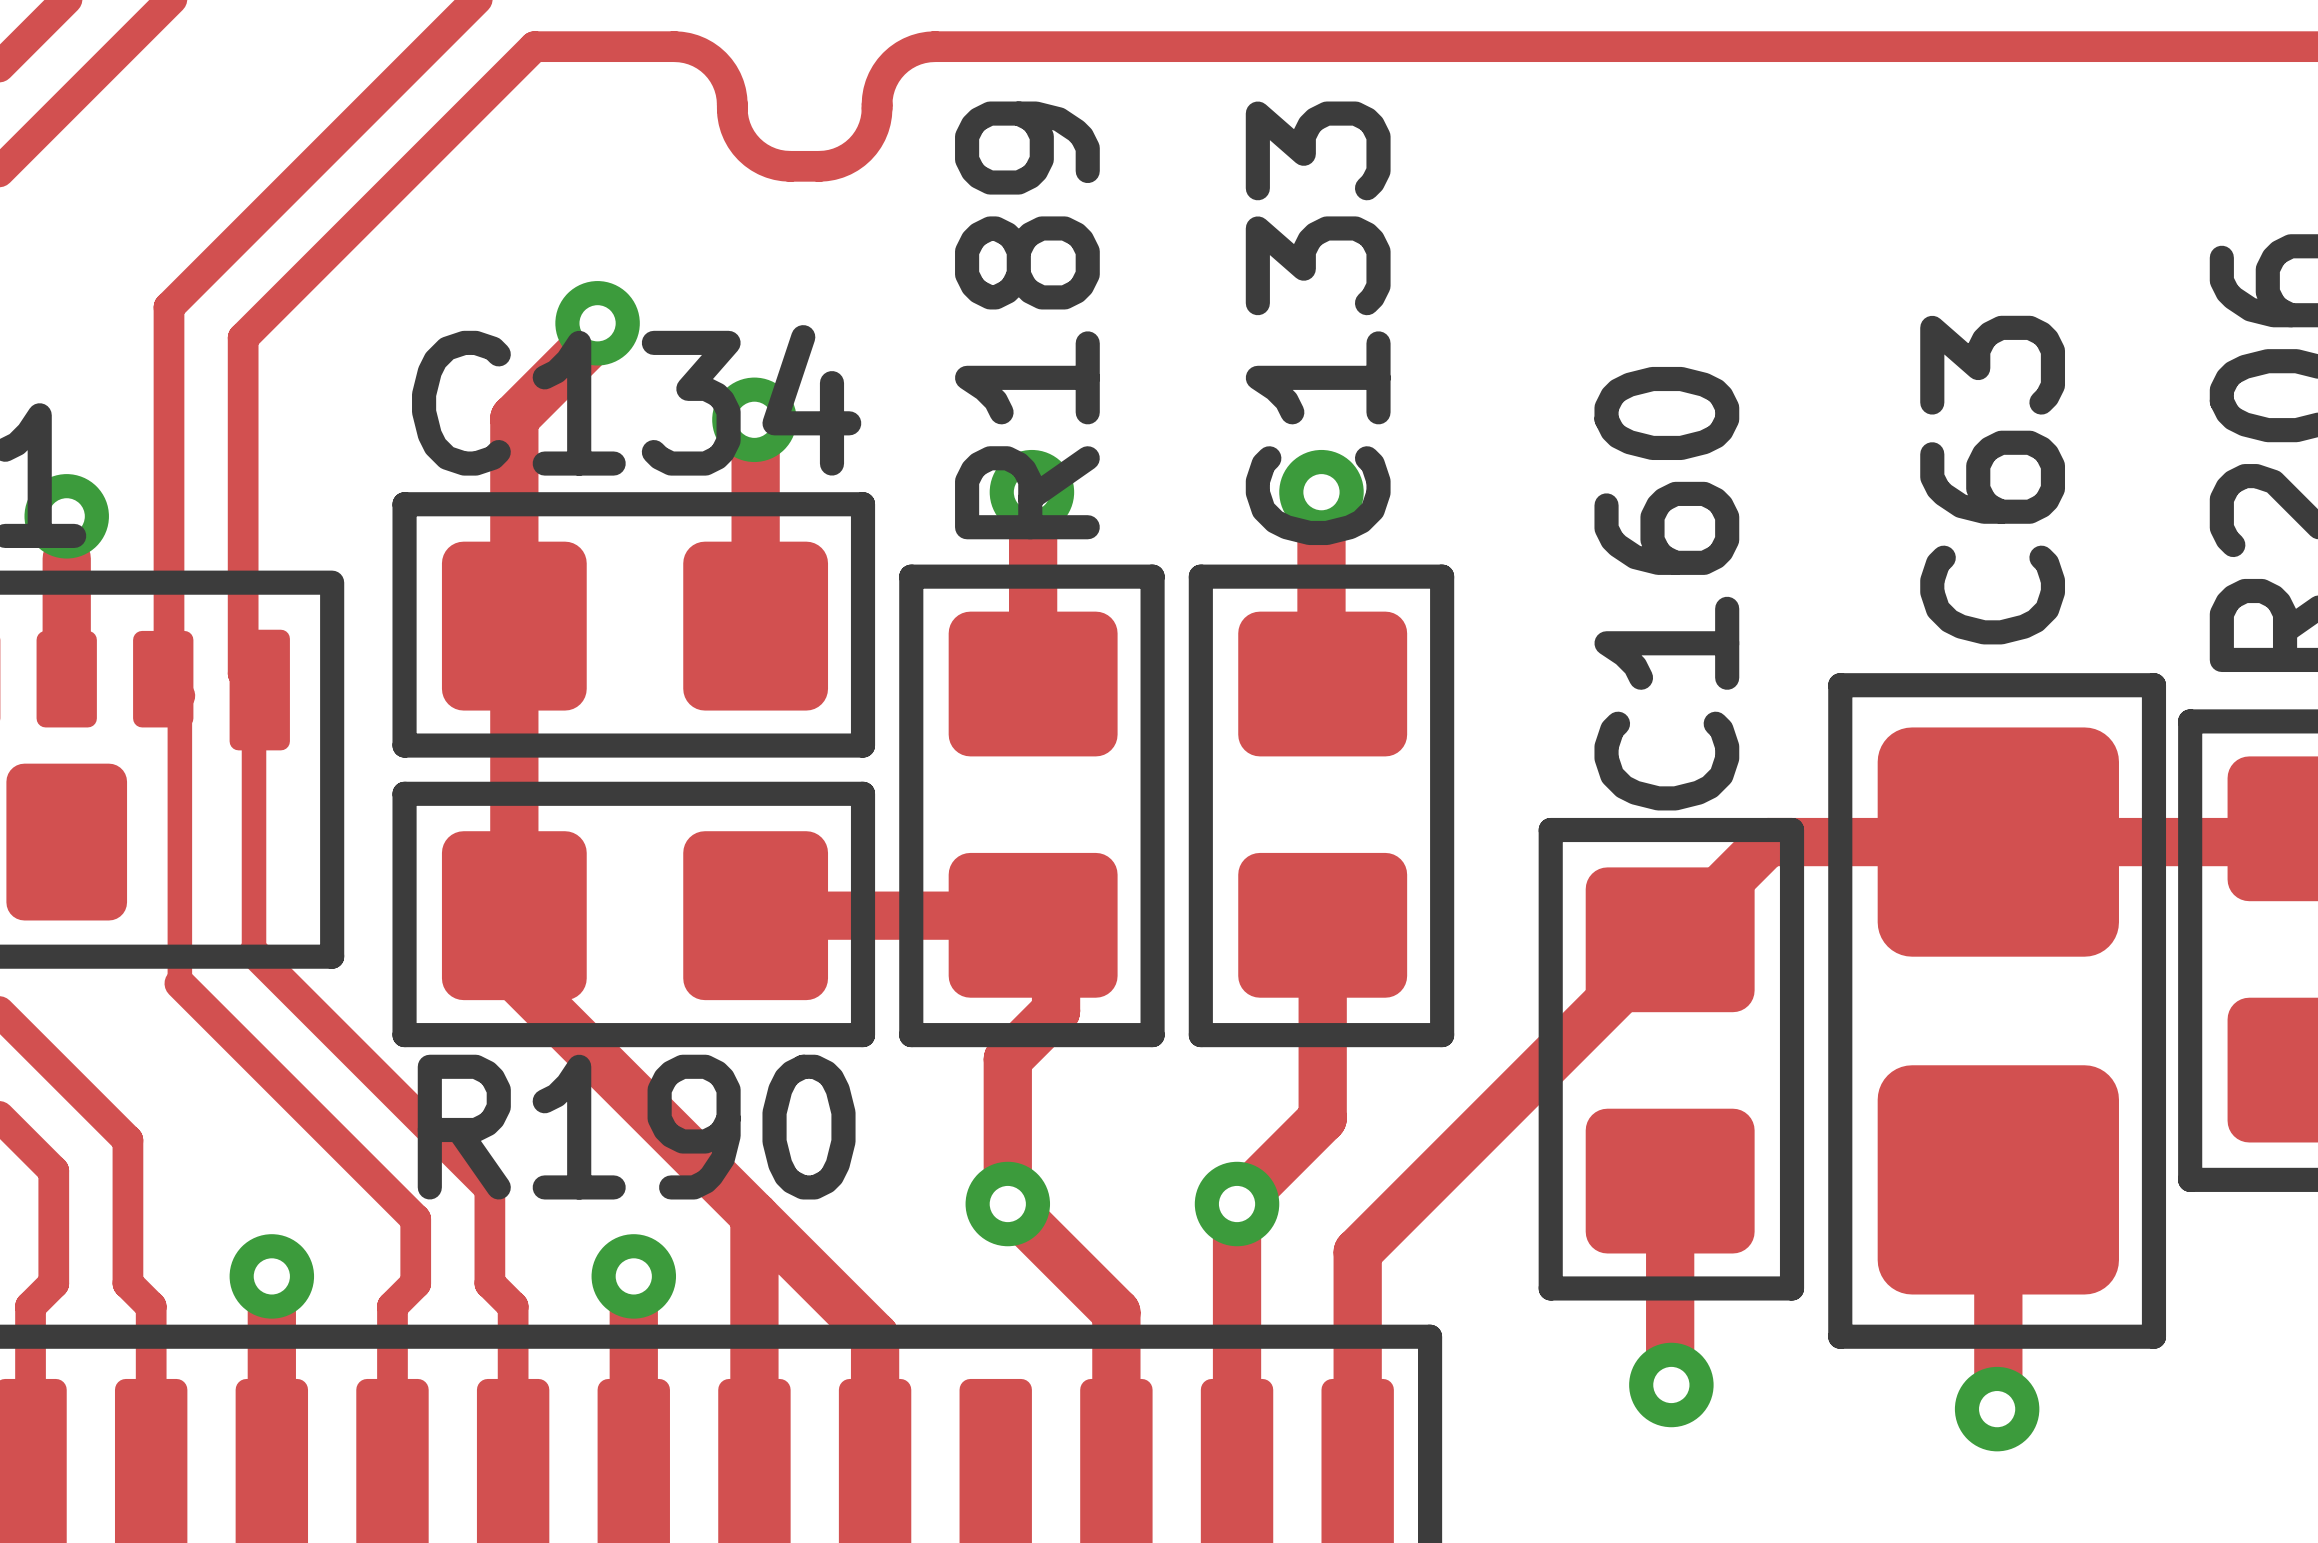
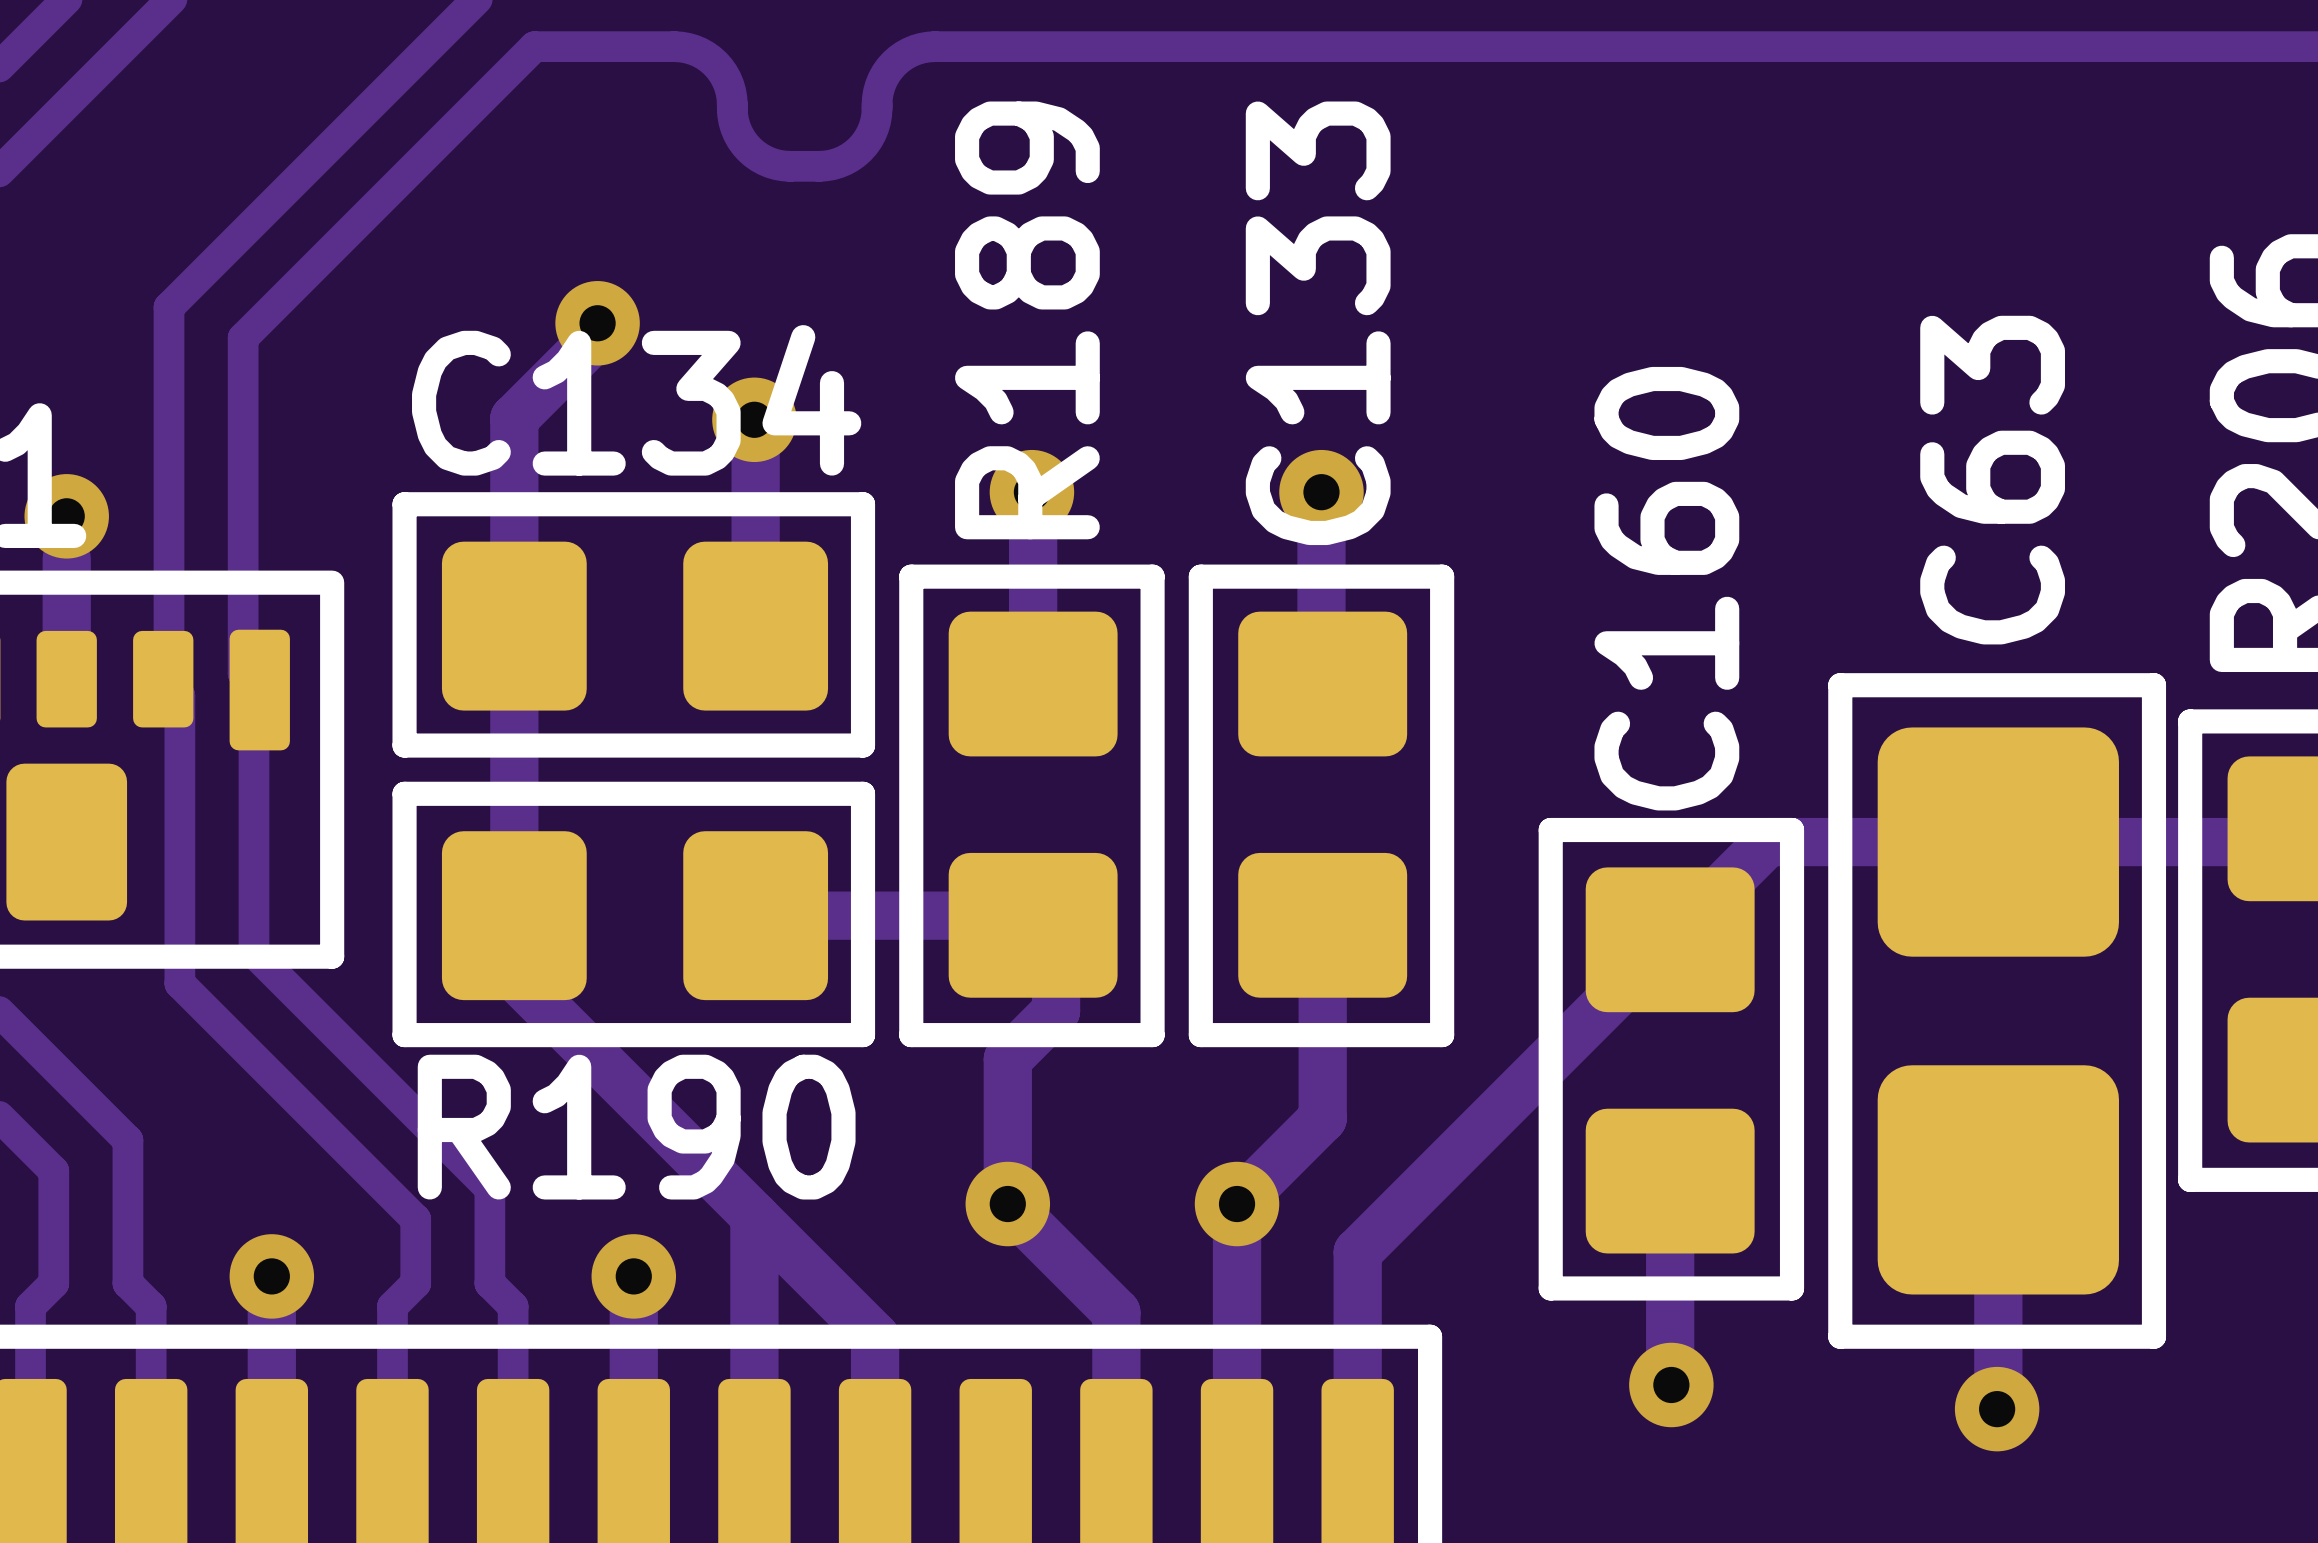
track width: thin (179, 695) (179, 983) -> thick (179, 695) (179, 983)
track width: thin (254, 695) (254, 952) -> thick (254, 695) (254, 952)

